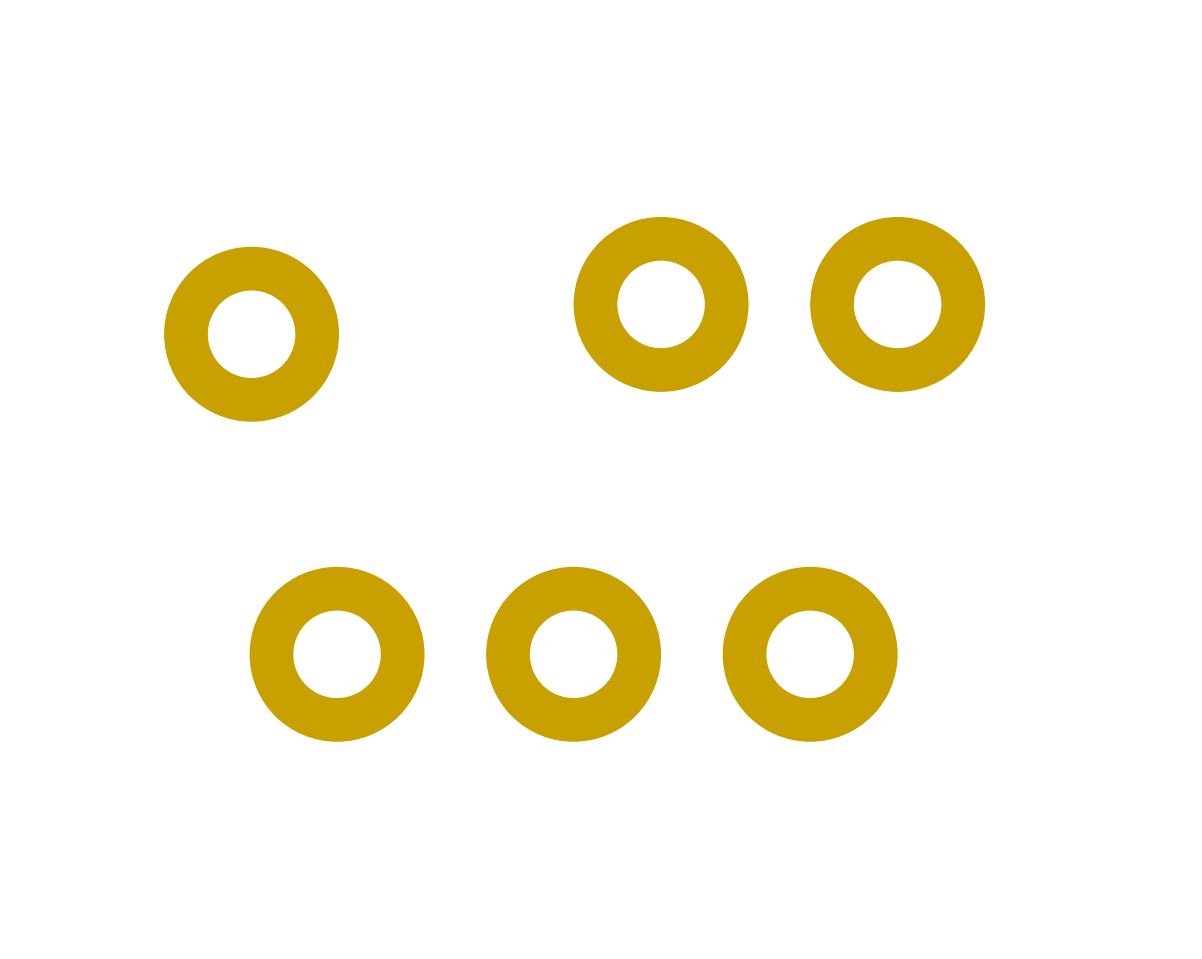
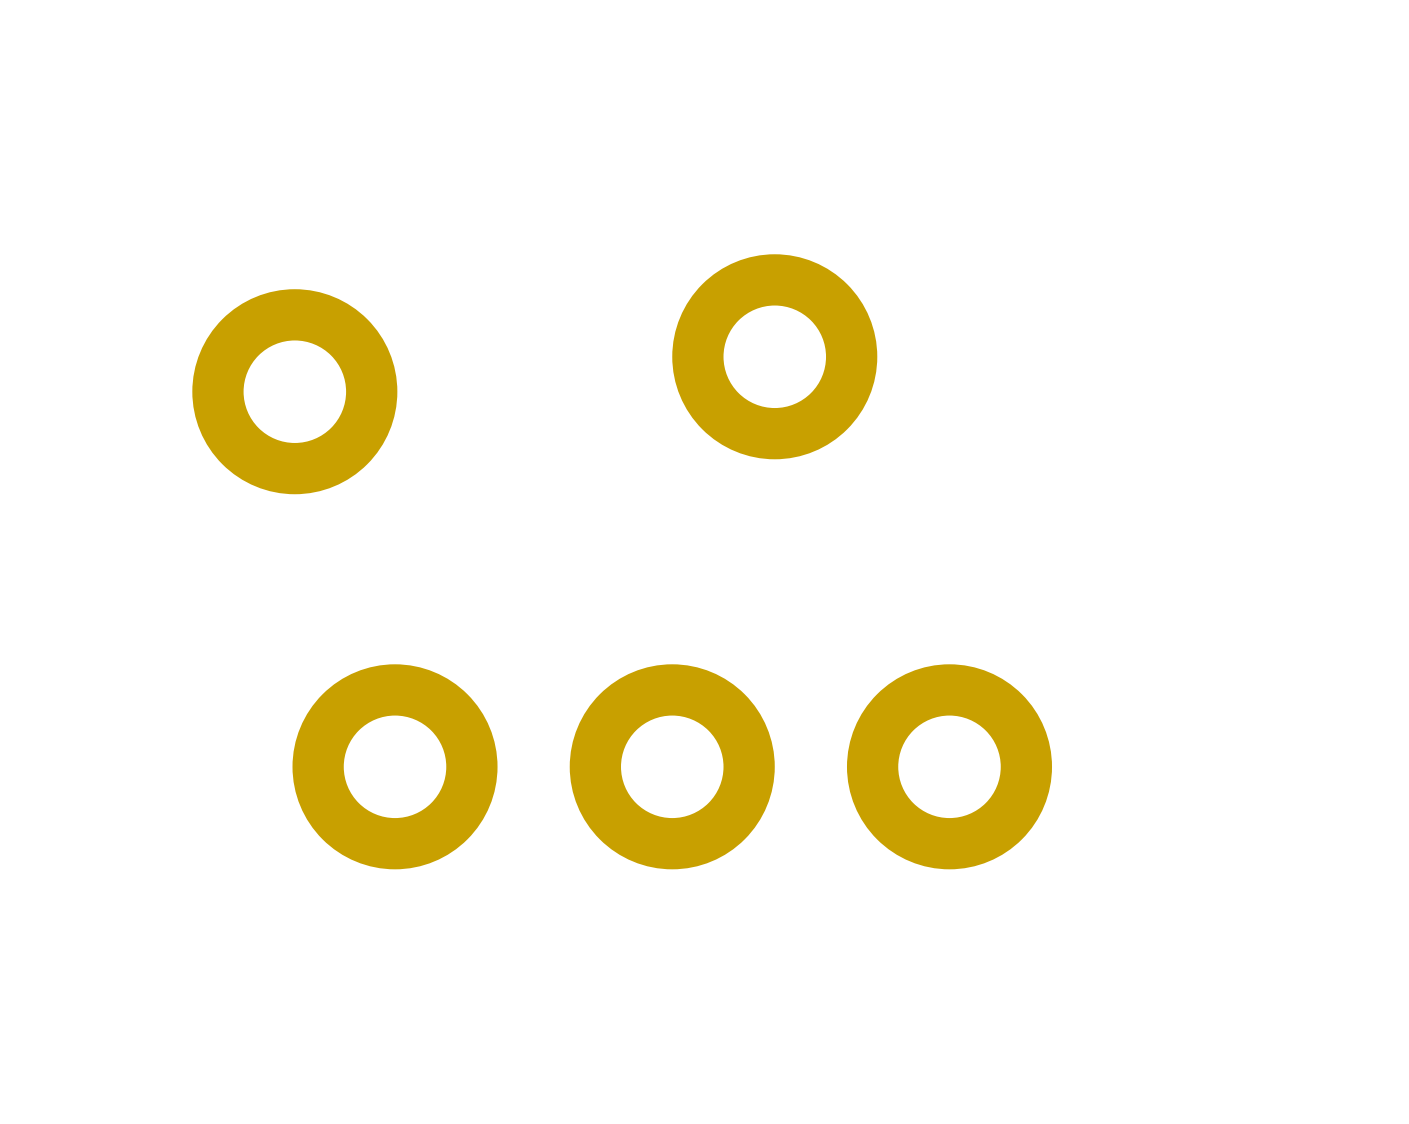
part: (897, 304) -> none

